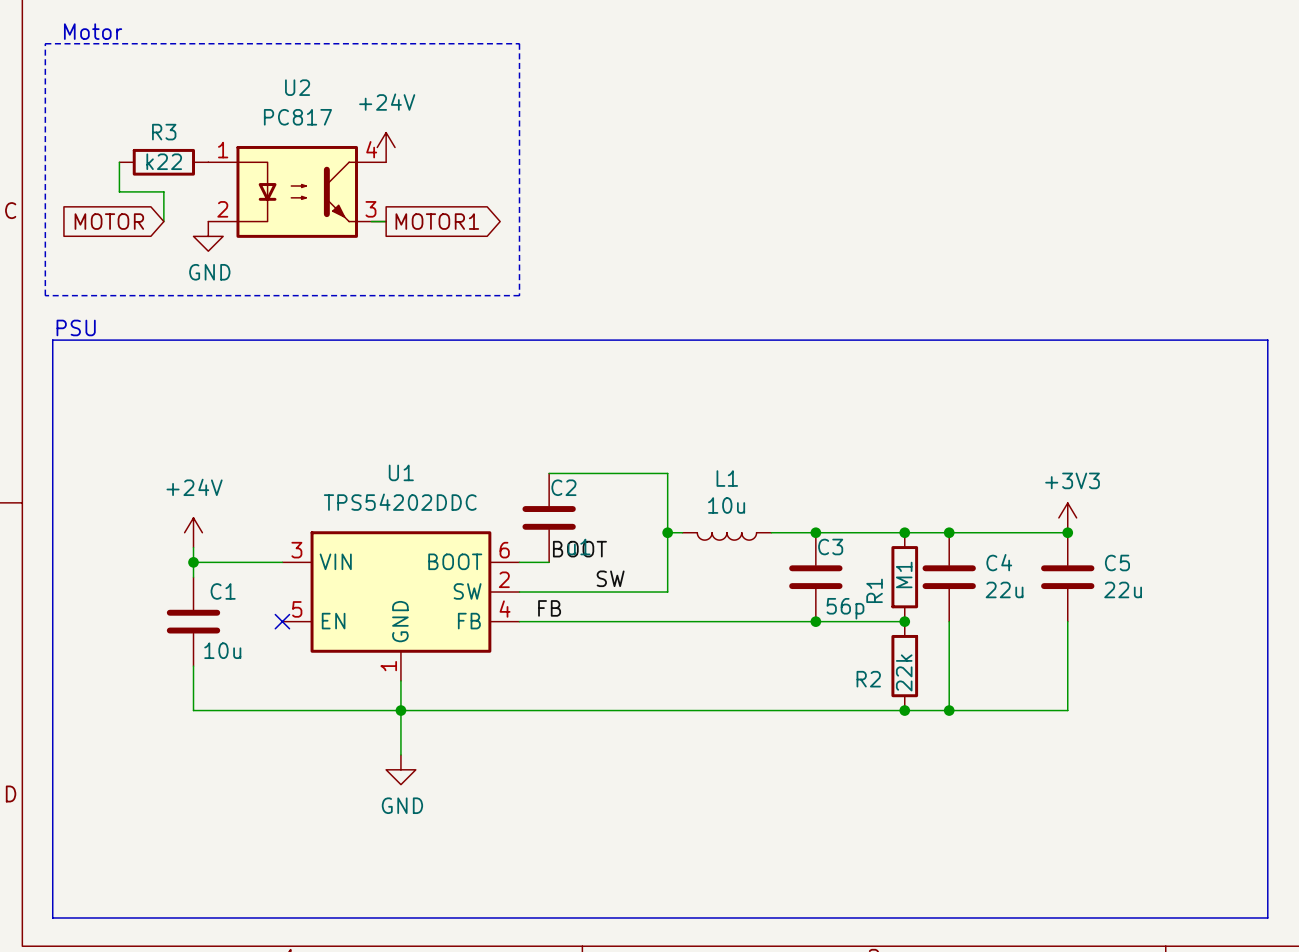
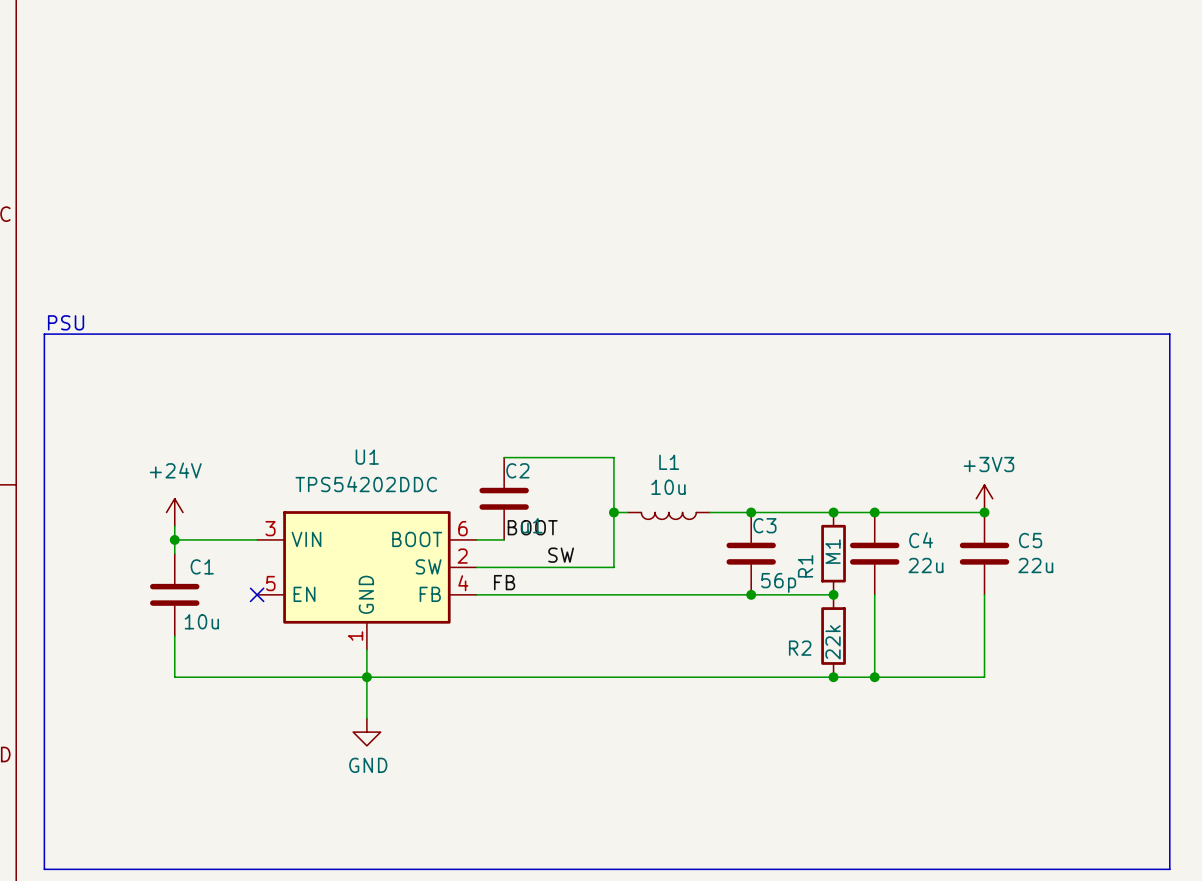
text: Motor (93, 31) -> none
line: (45, 43) (519, 43) (519, 295) (45, 295) (45, 43) -> none
power symbol: +24V (386, 147) -> none
wire: (119, 162) (119, 191) (163, 191) (163, 221) -> none
R3: k22 (163, 162) -> none
U2: PC817 (297, 191) -> none
global label: MOTOR (109, 221) -> none
wire: (371, 221) (386, 221) -> none
global label: MOTOR1 (437, 221) -> none
power symbol: GND (208, 236) -> none

